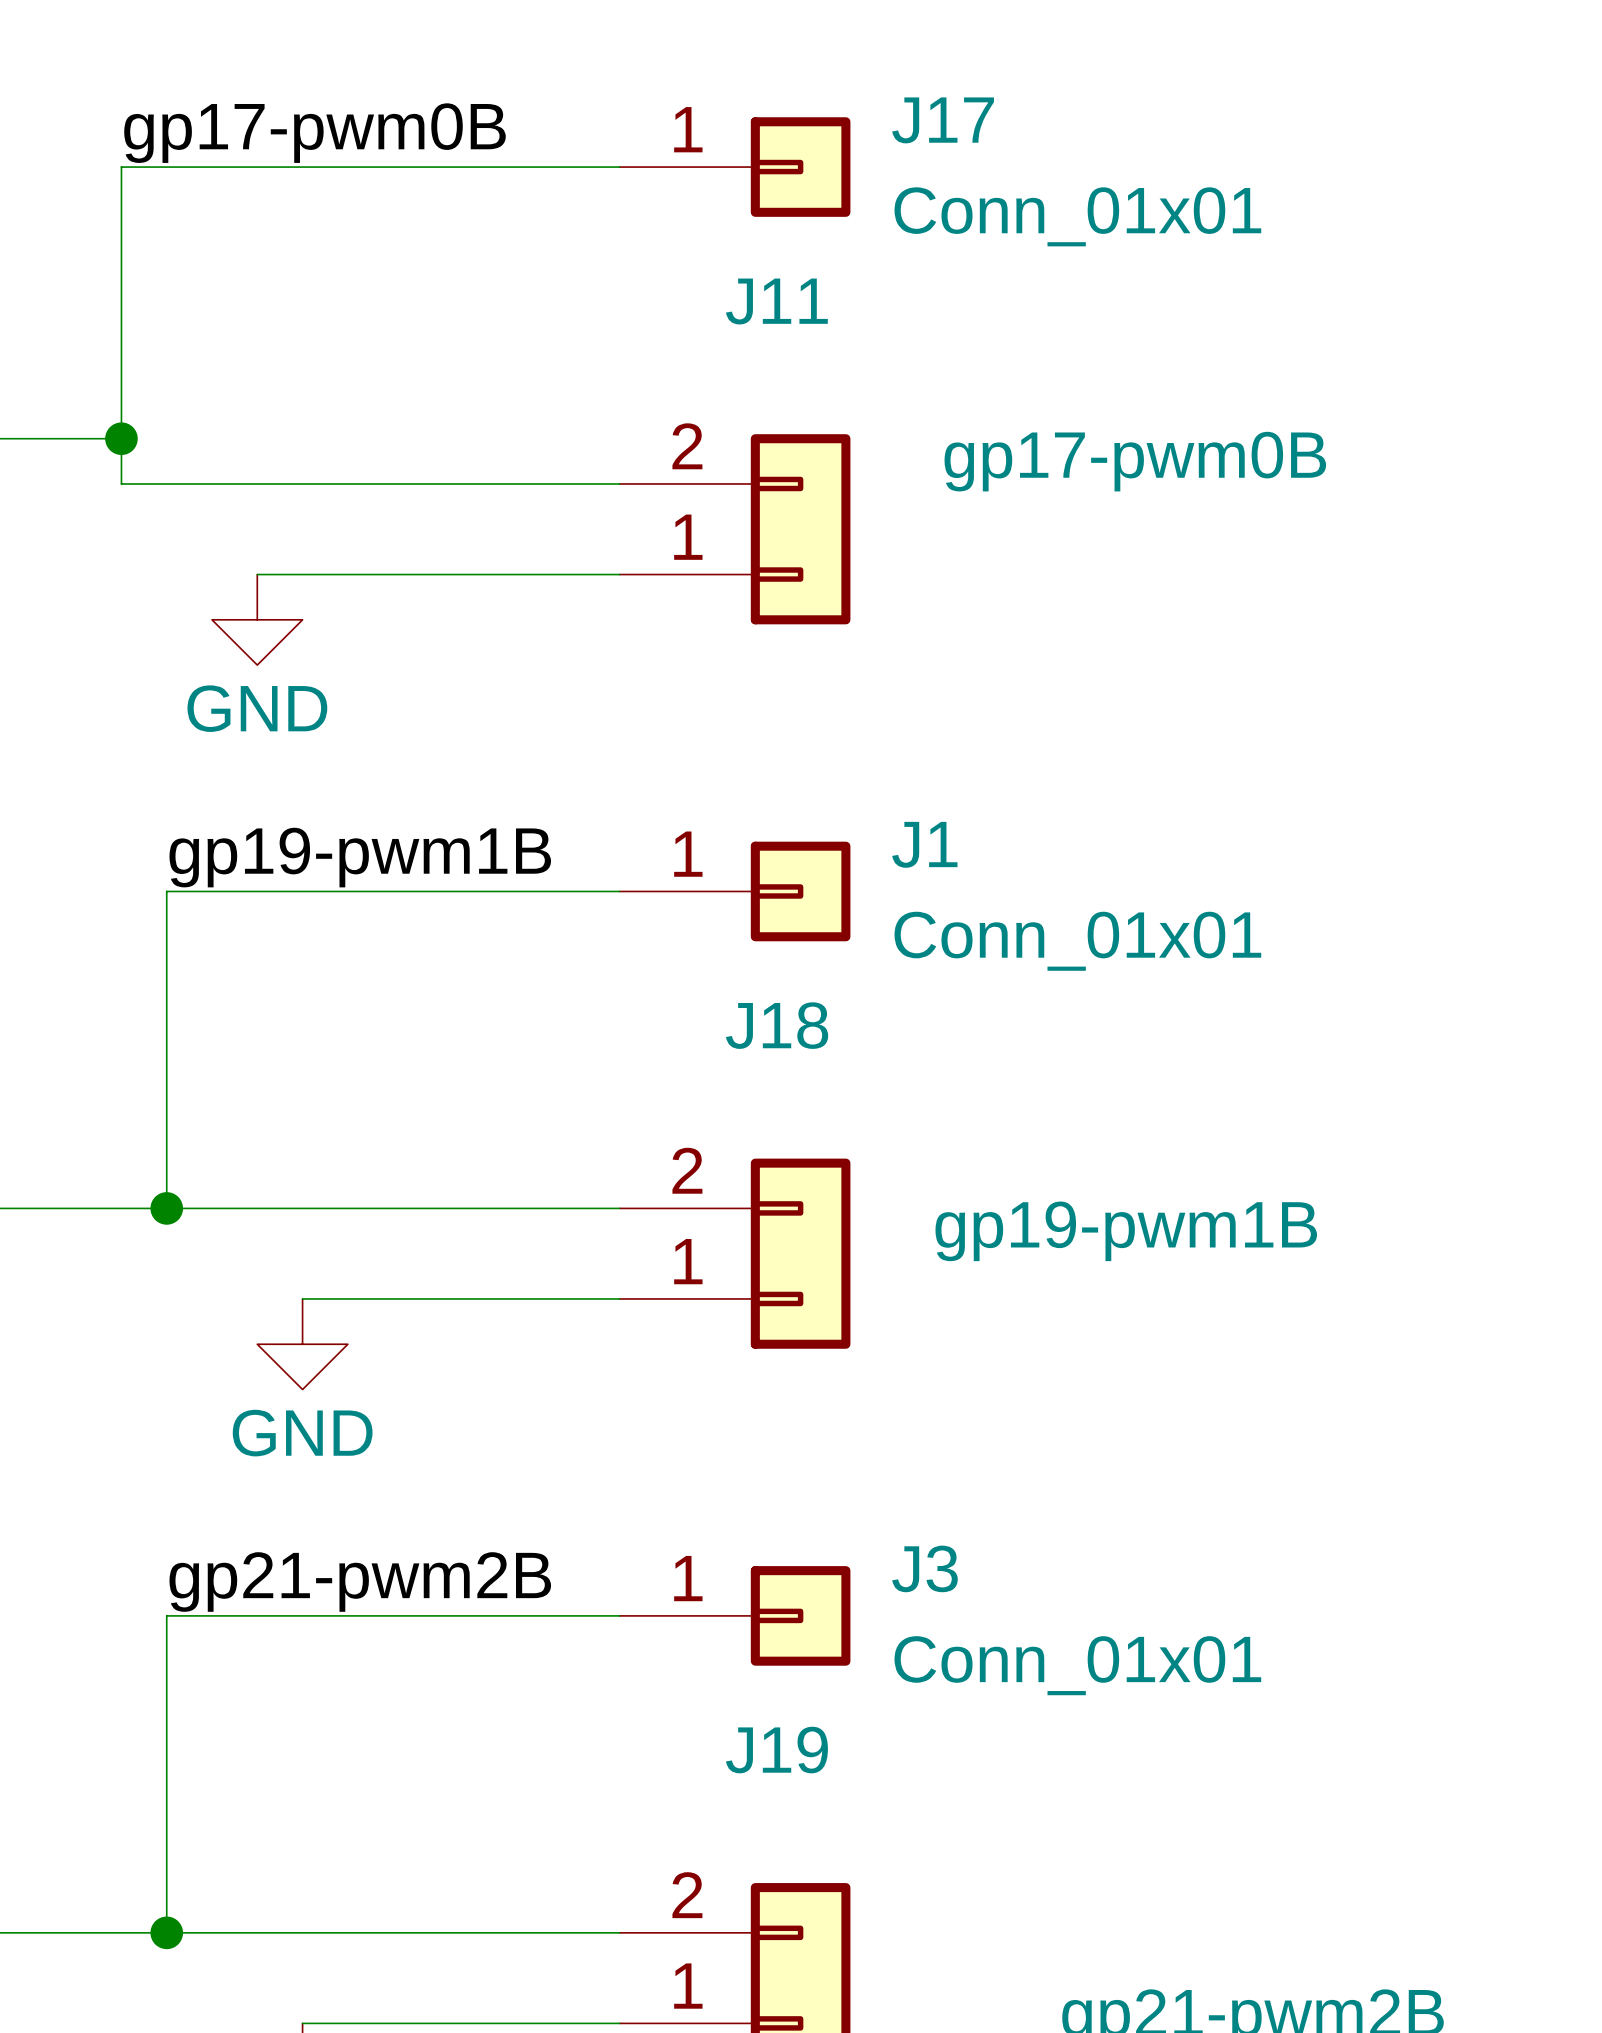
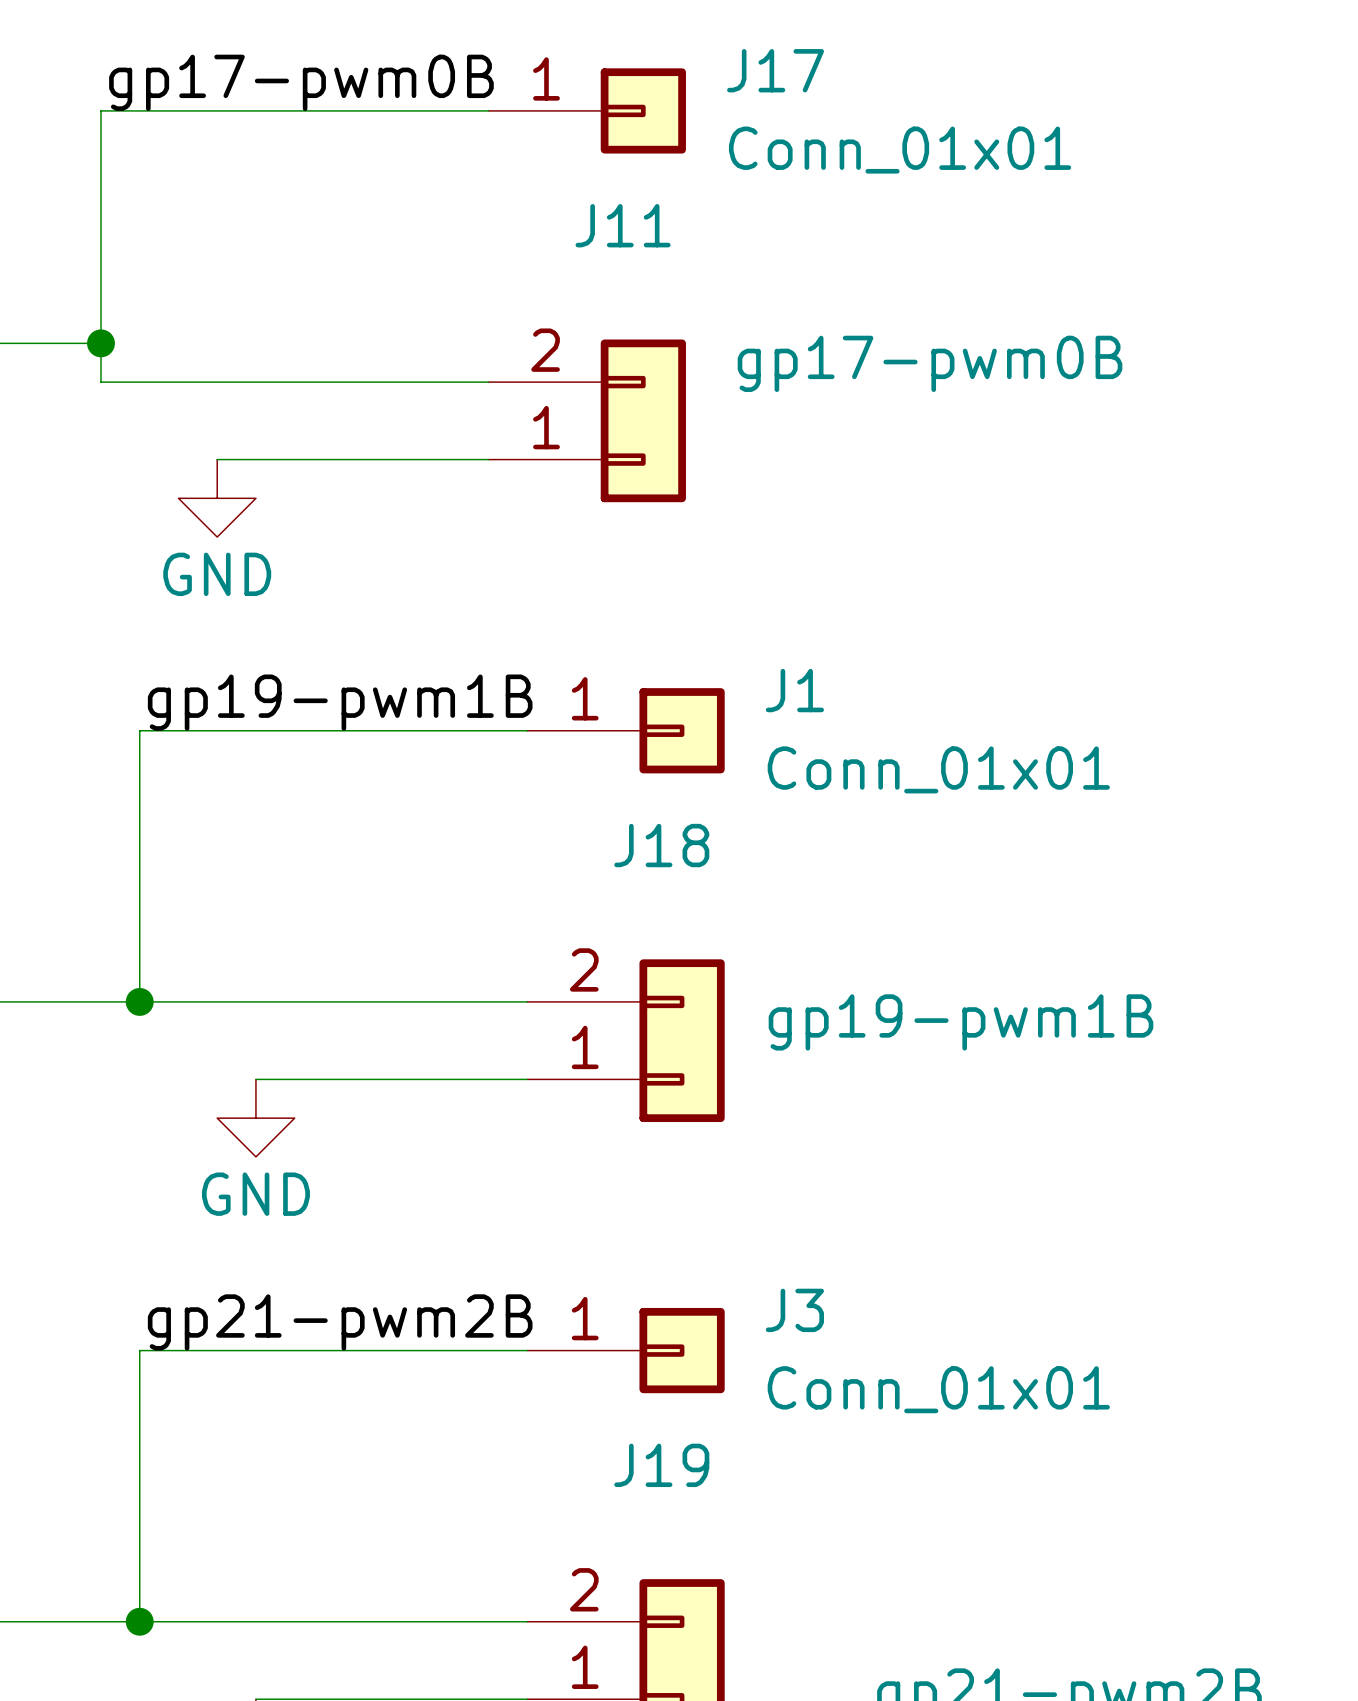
J17 position: (734, 167) -> (587, 110)
J11 position: (734, 529) -> (587, 420)

